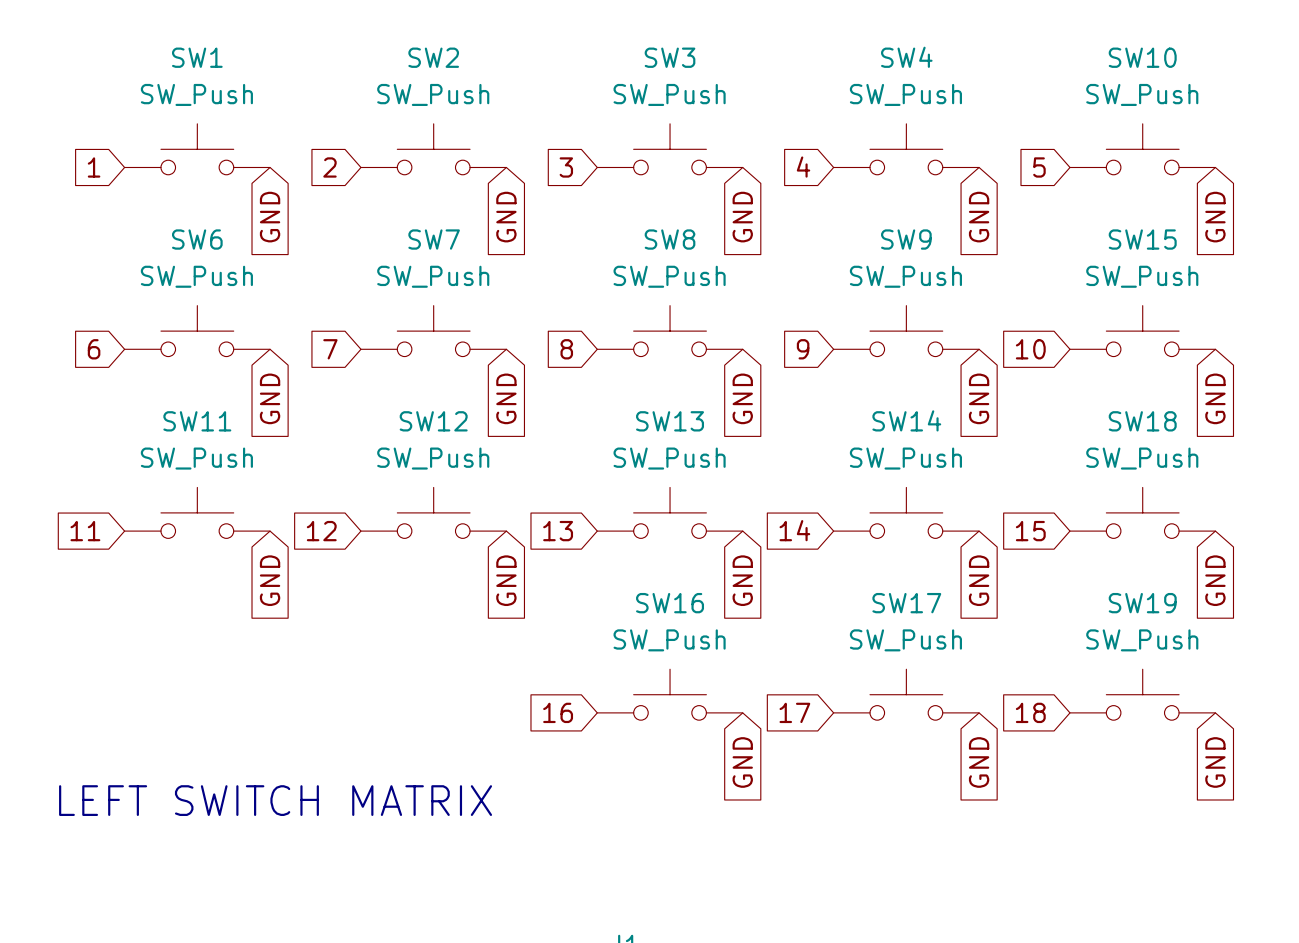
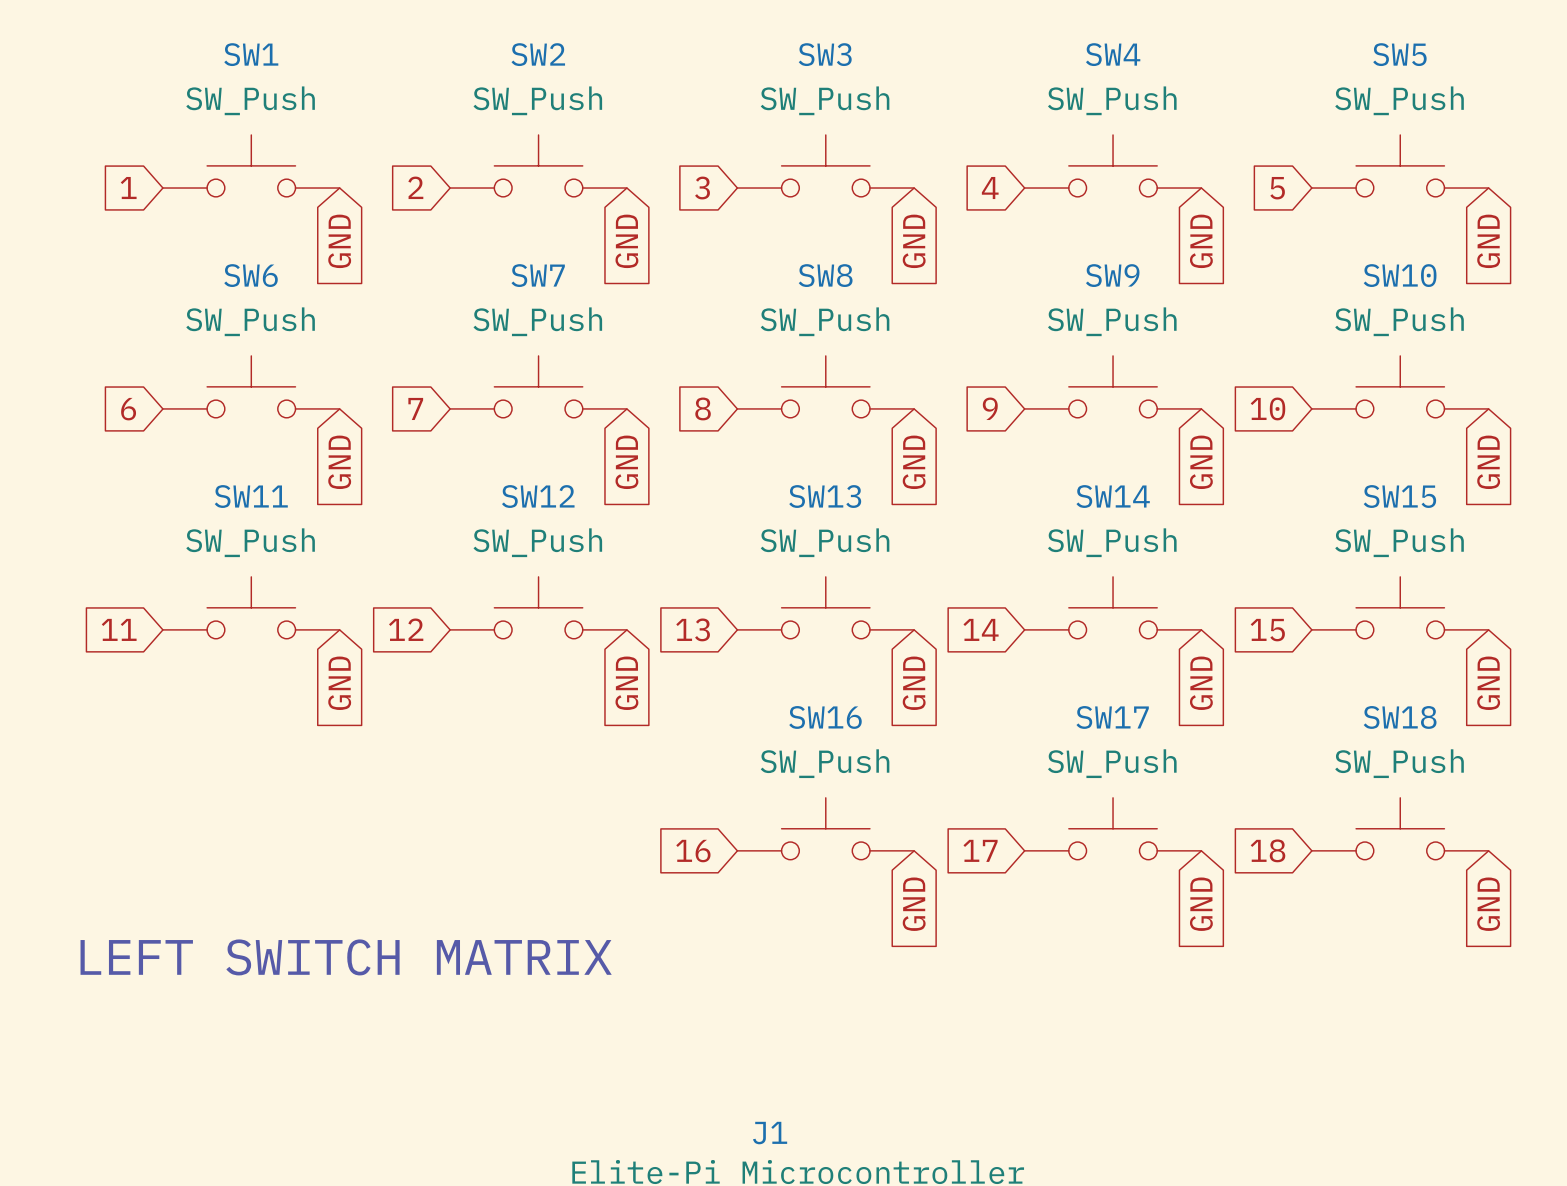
SW10 name: SW10 (1142, 57) -> SW5 (1399, 54)
SW15 name: SW15 (1142, 239) -> SW10 (1400, 275)
SW18 name: SW18 (1142, 421) -> SW15 (1399, 496)
SW19 name: SW19 (1142, 603) -> SW18 (1400, 717)

